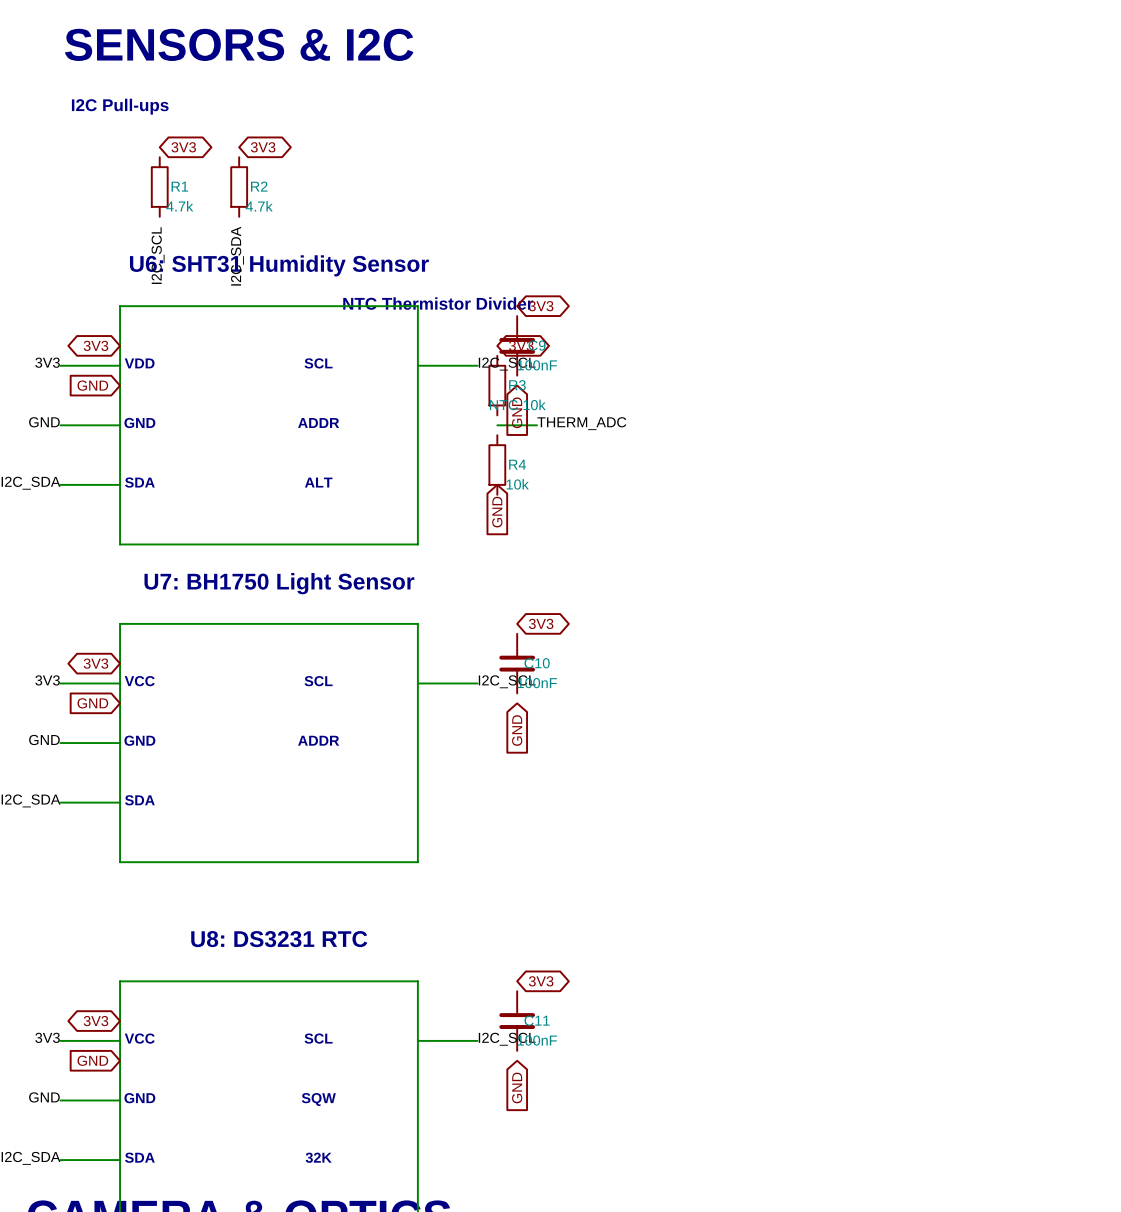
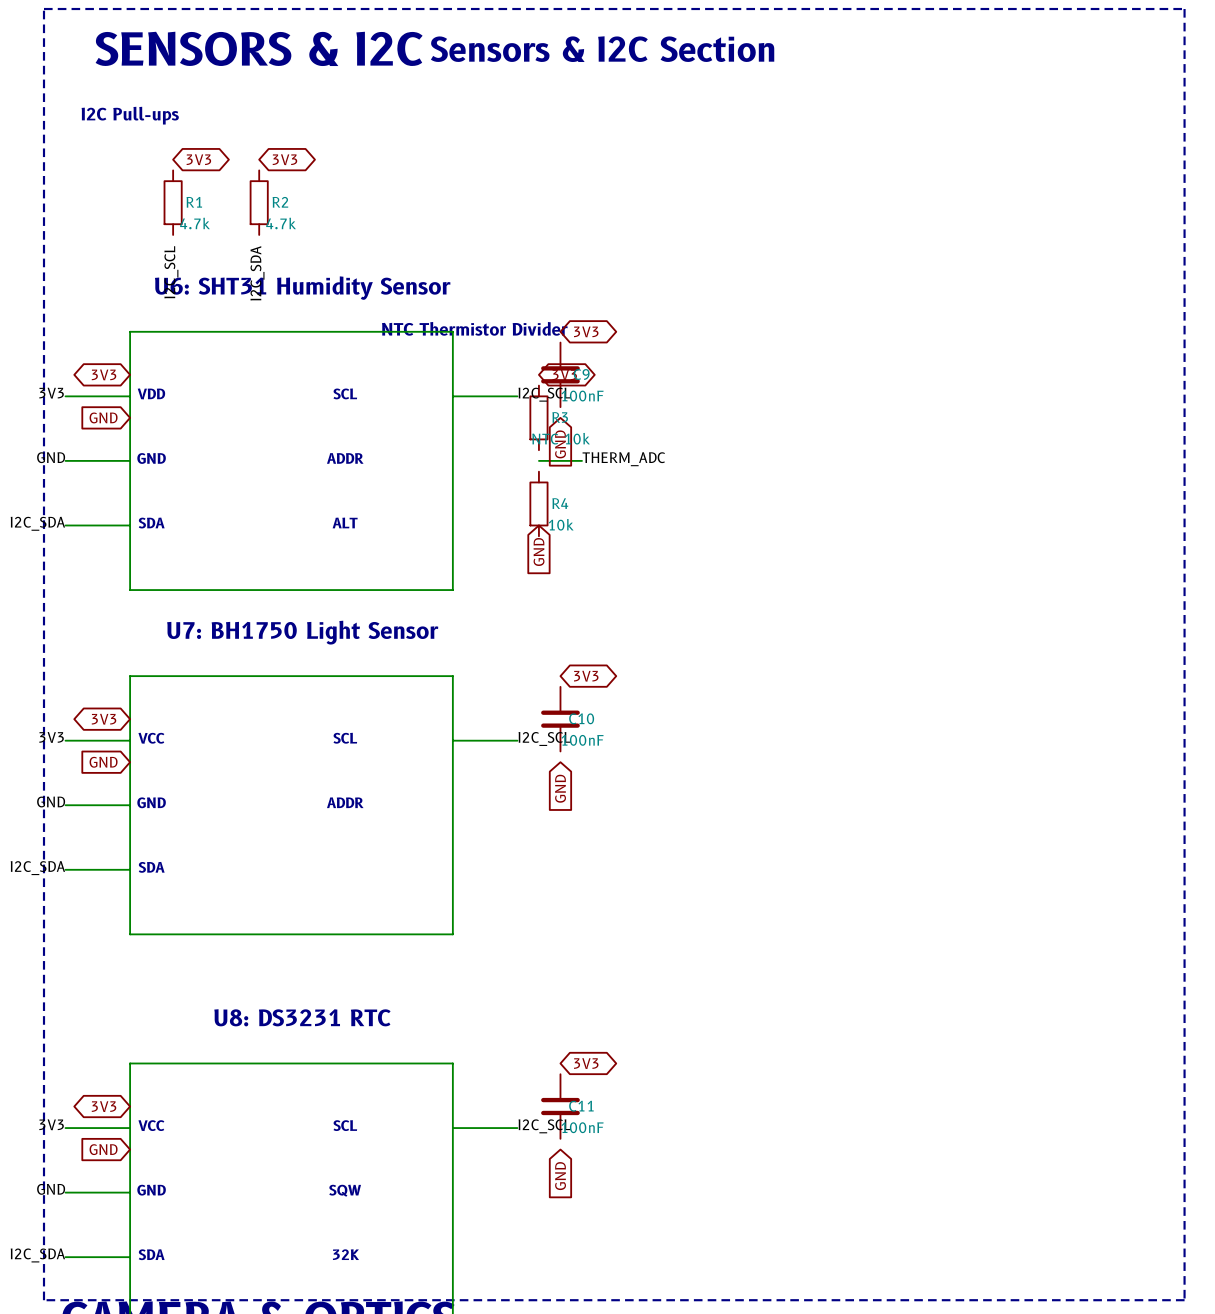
line: none -> (44, 9) (1184, 9) (1184, 1300) (44, 1300) (44, 9)
text: none -> Sensors & I2C Section (602, 49)

